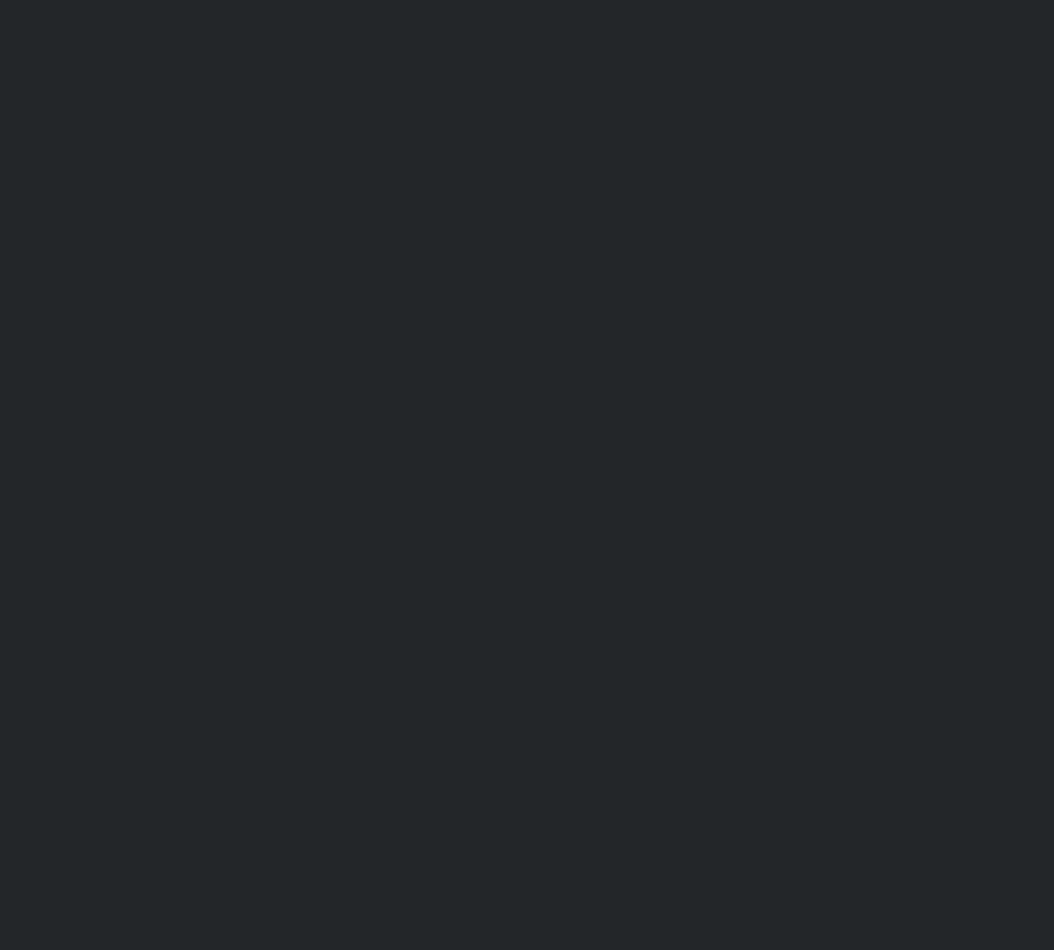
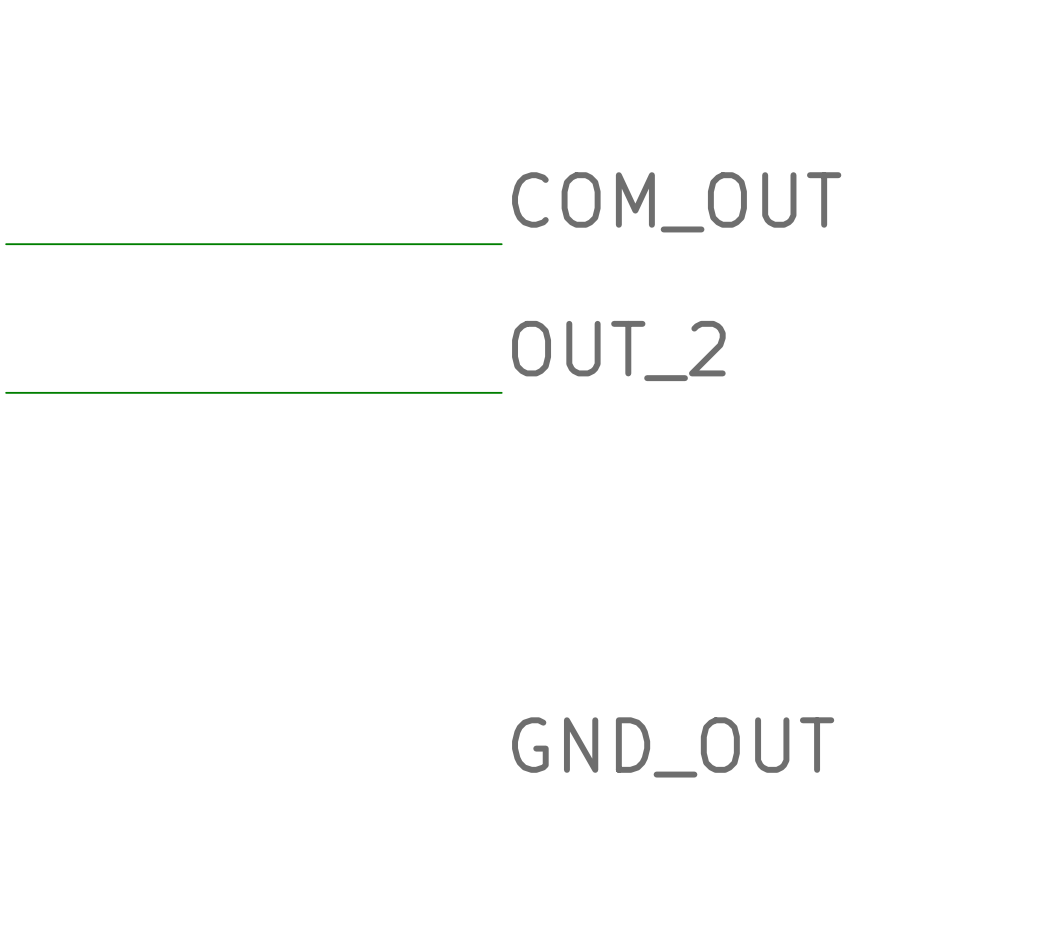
label: none -> COM_OUT (676, 202)
wire: none -> (6, 244) (501, 244)
label: none -> OUT_2 (618, 350)
wire: none -> (6, 392) (501, 392)
label: none -> GND_OUT (673, 747)

